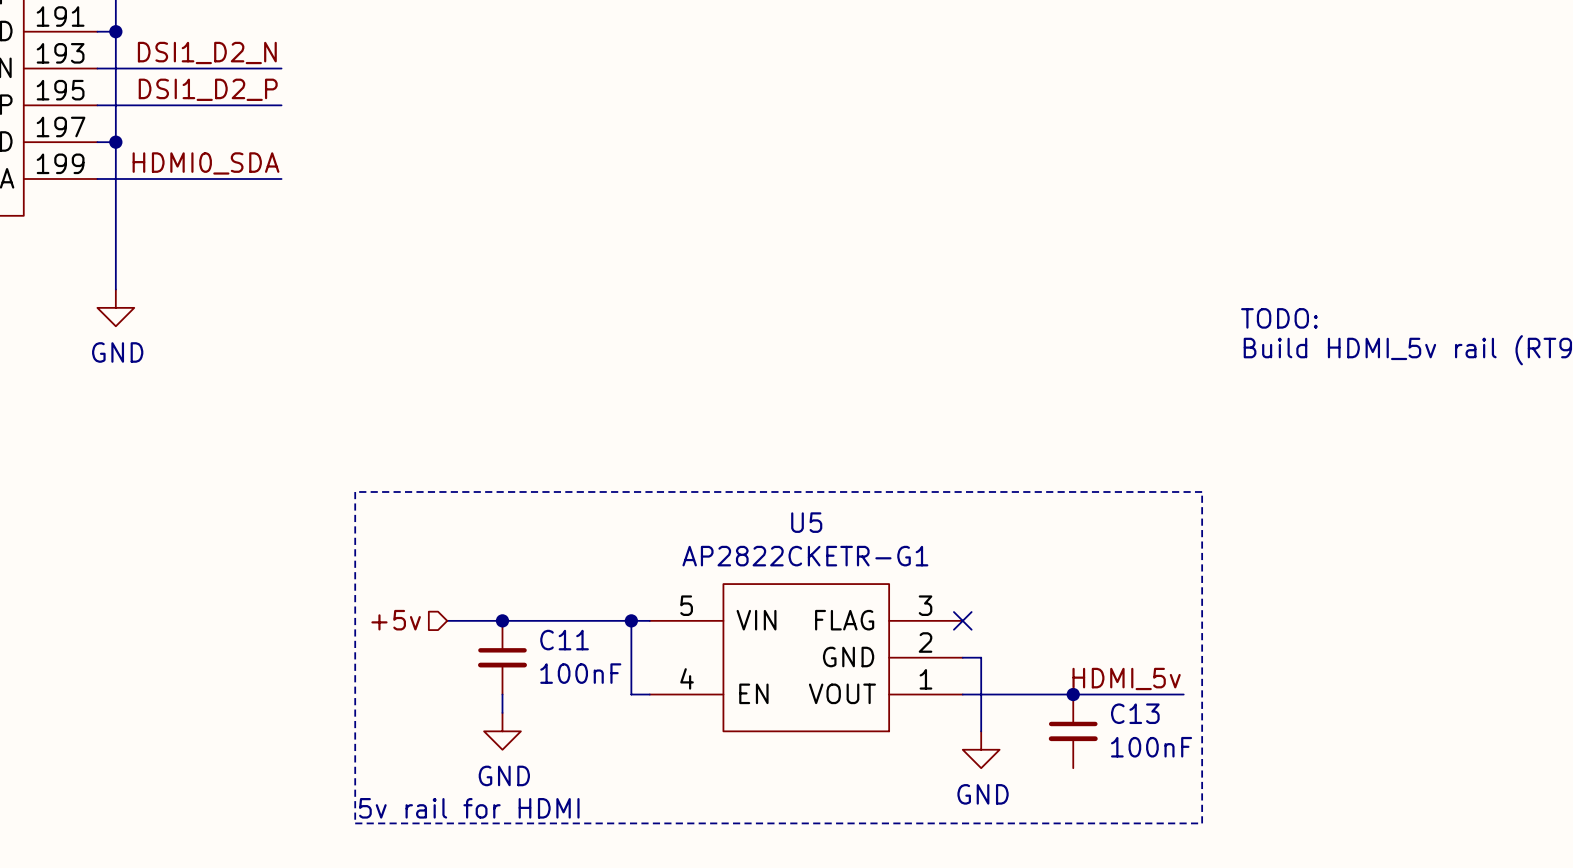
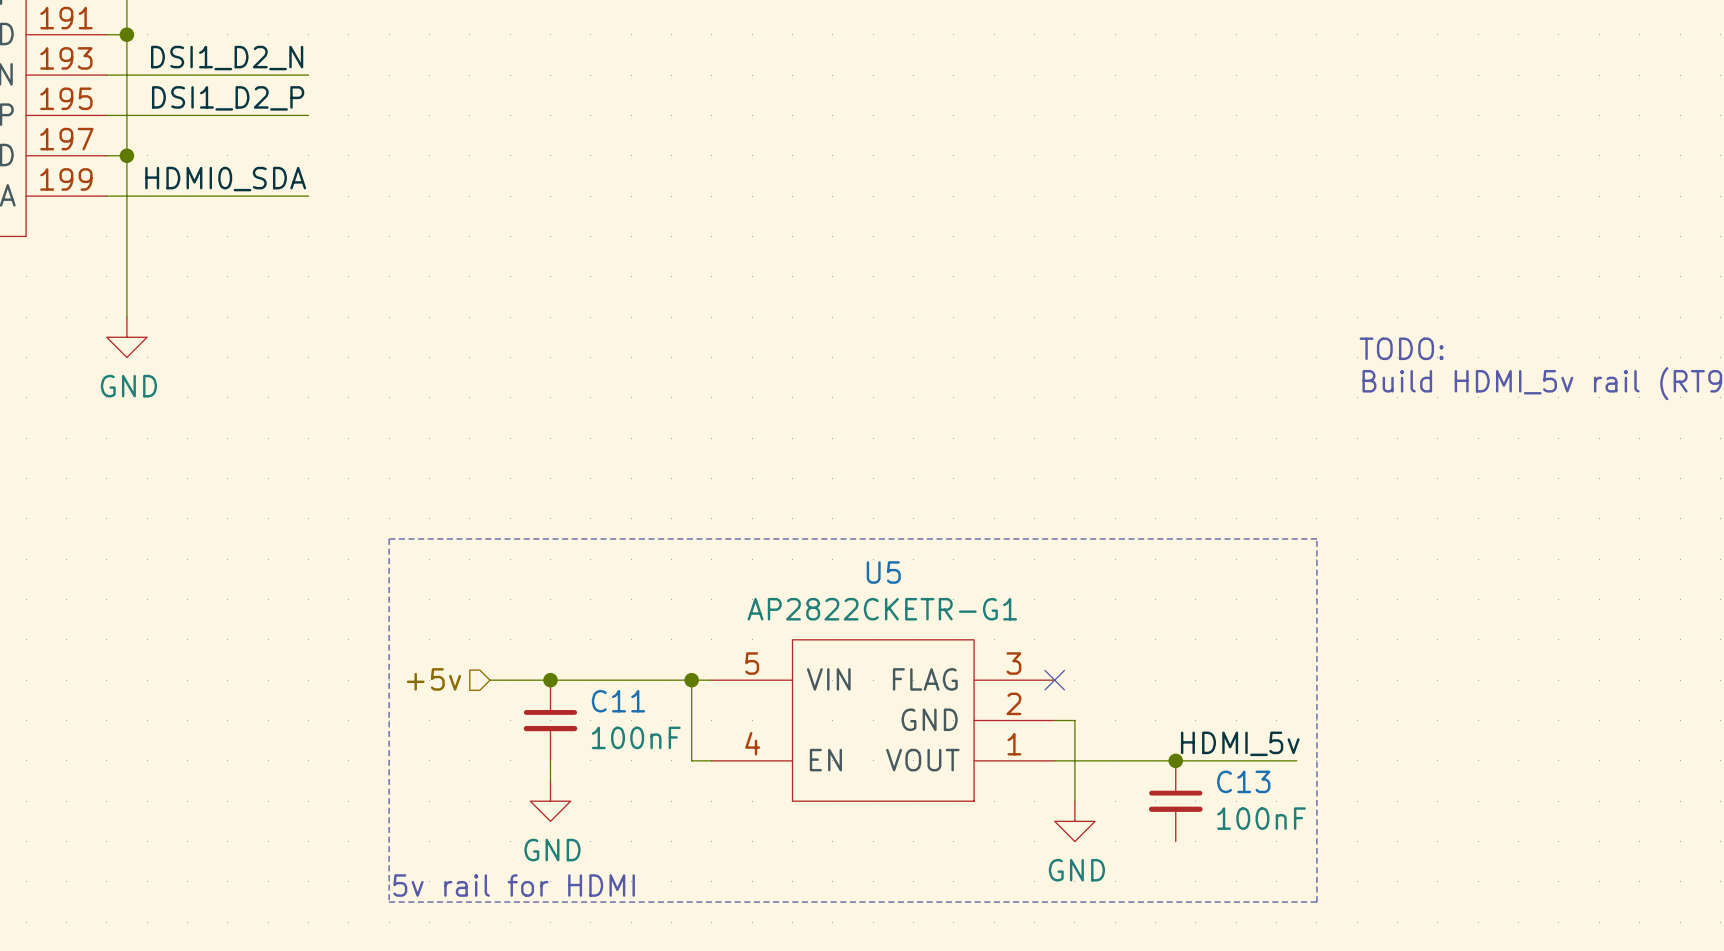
label position: HDMI_5v (1126, 678) -> HDMI_5v (1240, 743)

